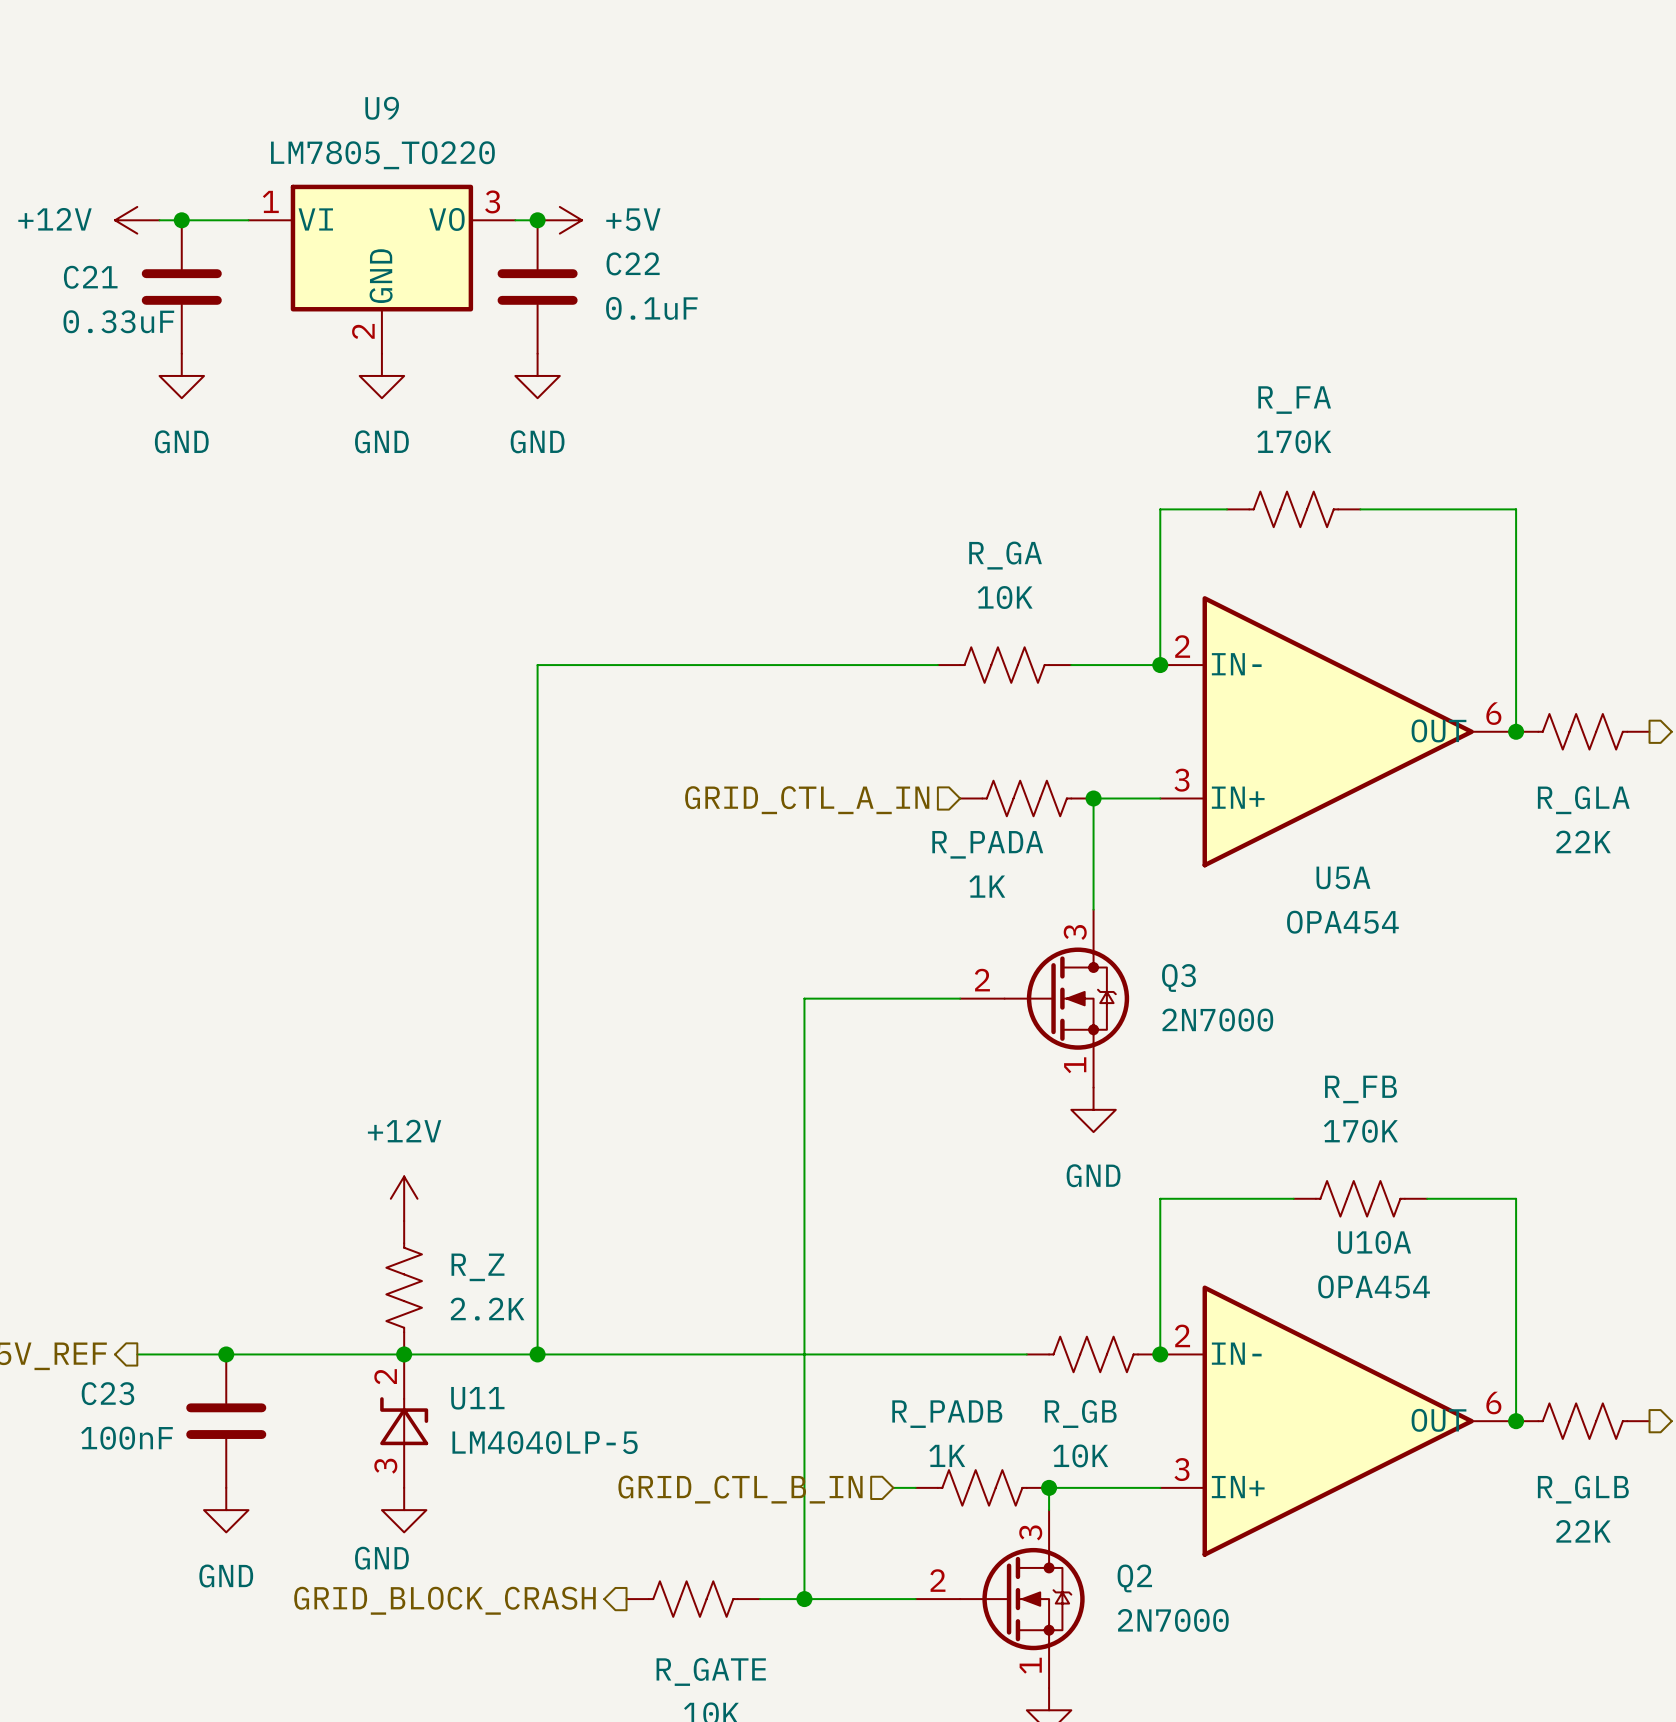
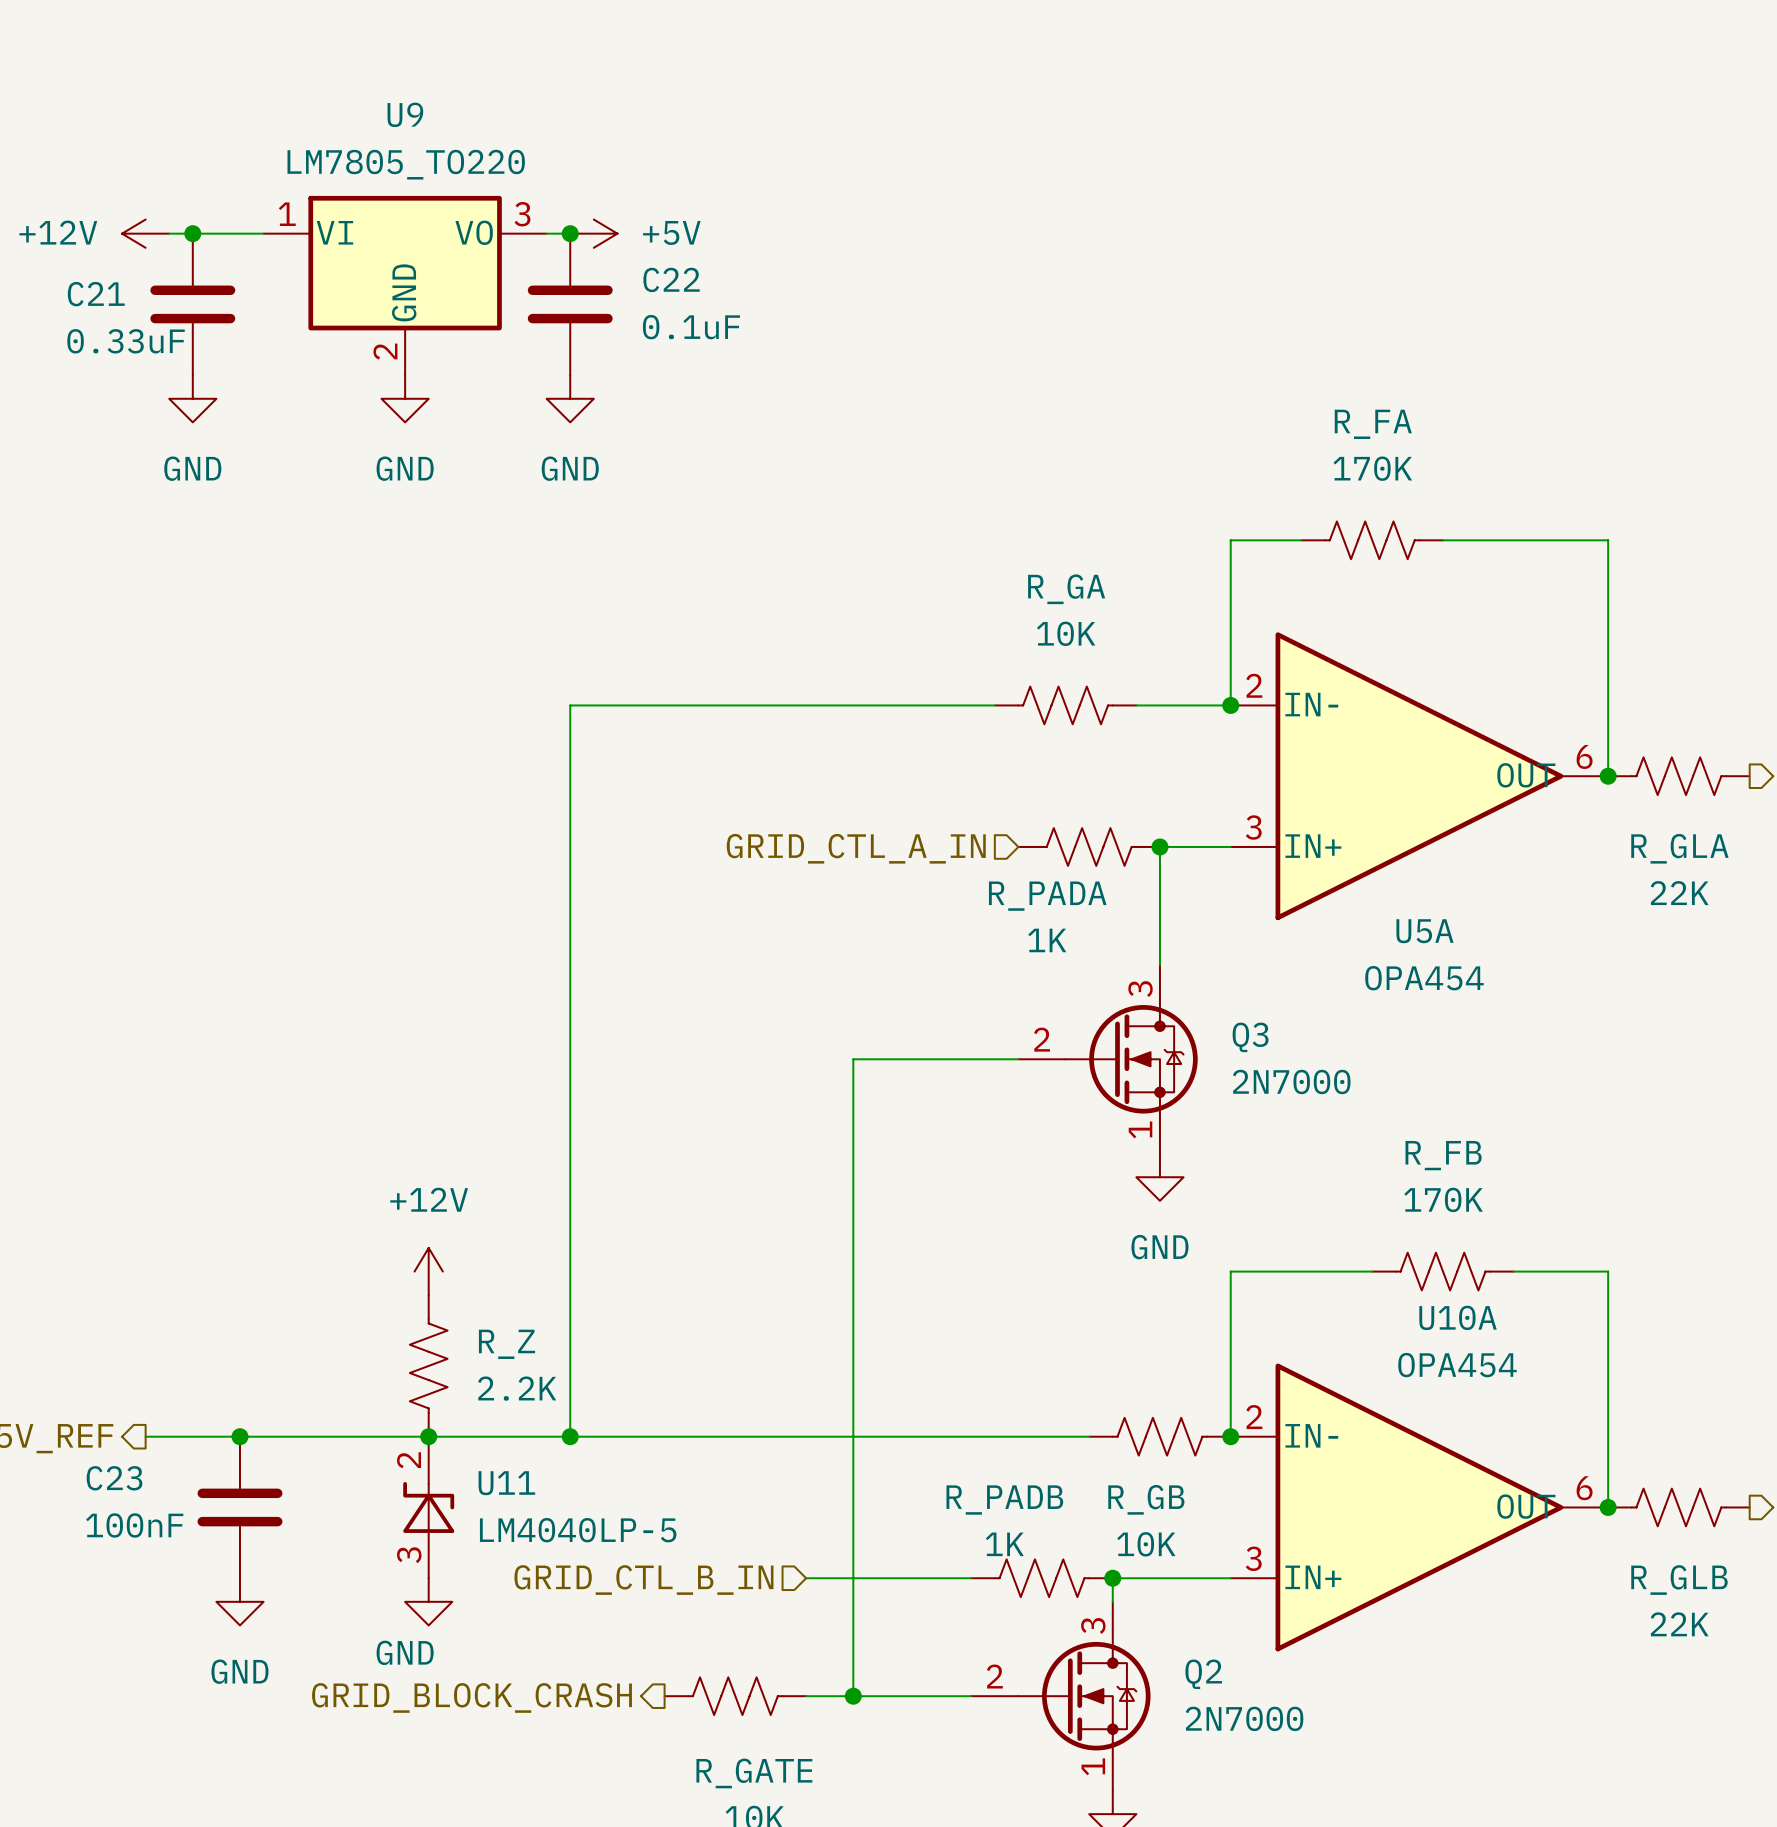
wire: none -> (806, 1578) (947, 1578)
hierarchical label position: GRID_CTL_B_IN (740, 1489) -> GRID_CTL_B_IN (643, 1580)

